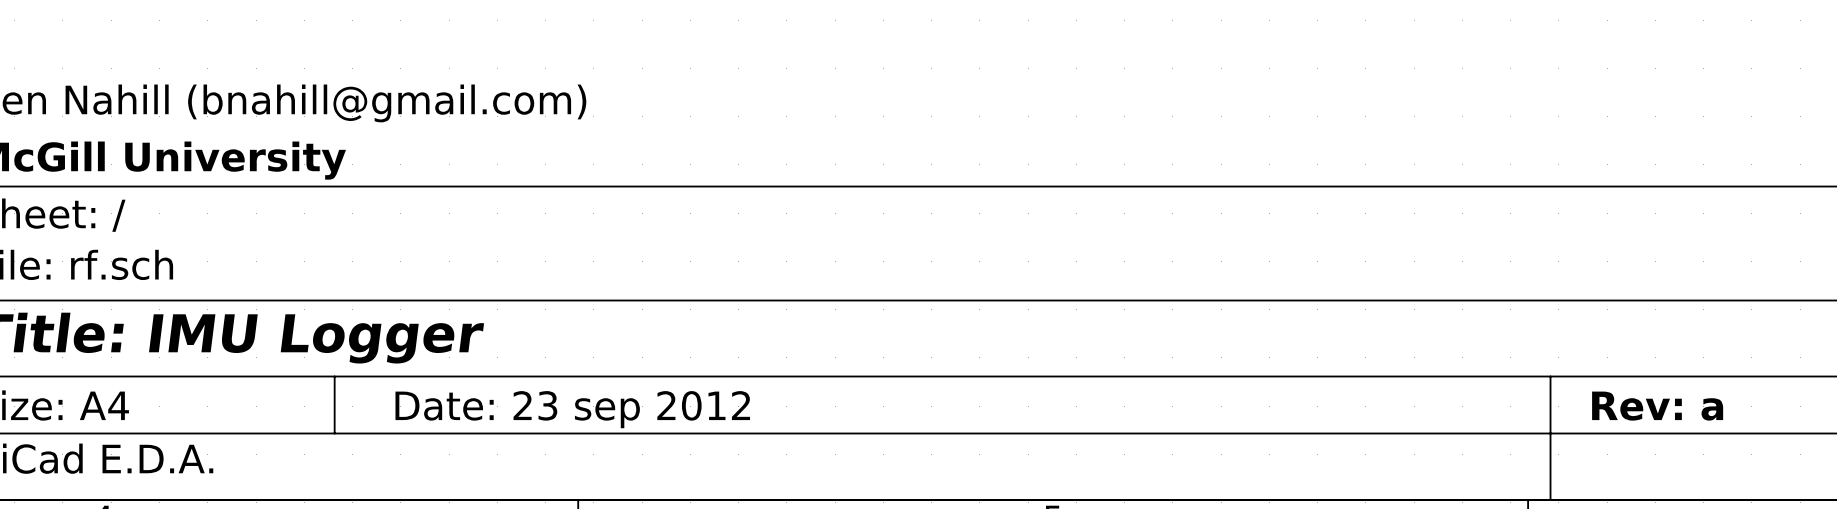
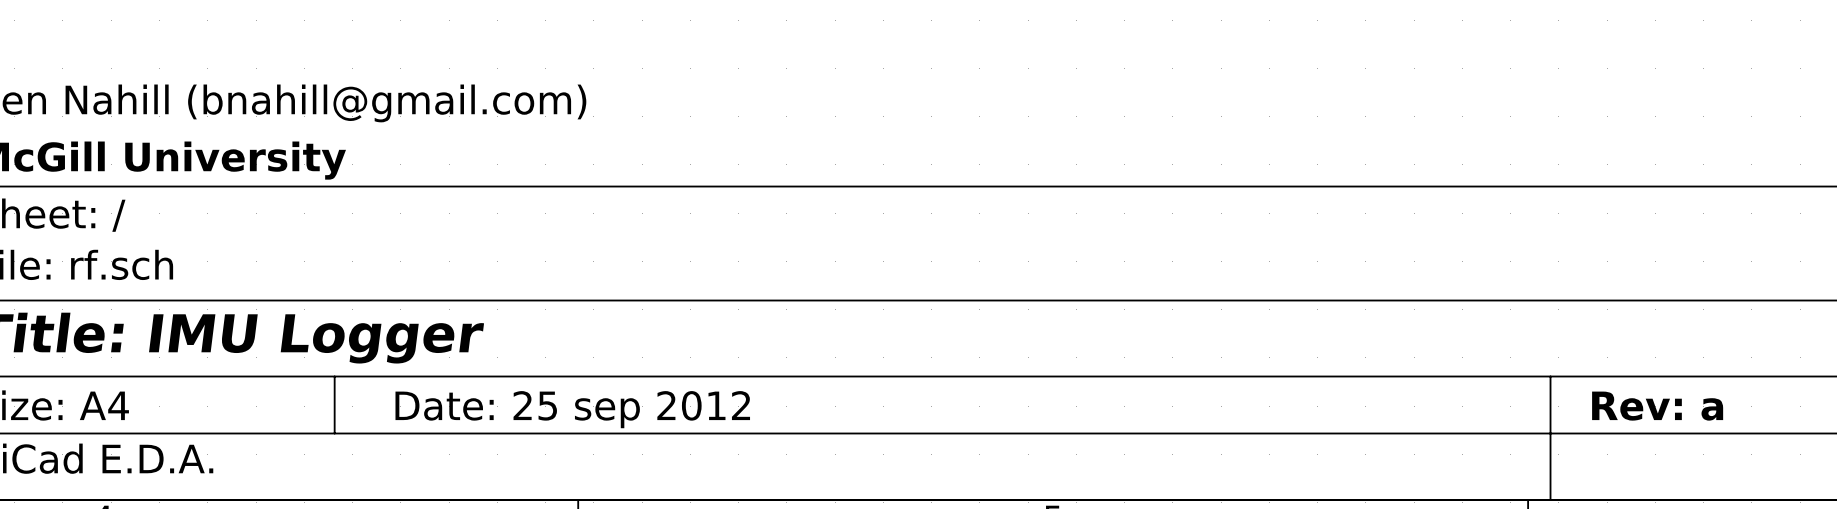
title block: Date: 23 sep 2012 (572, 409) -> Date: 25 sep 2012 (572, 409)

